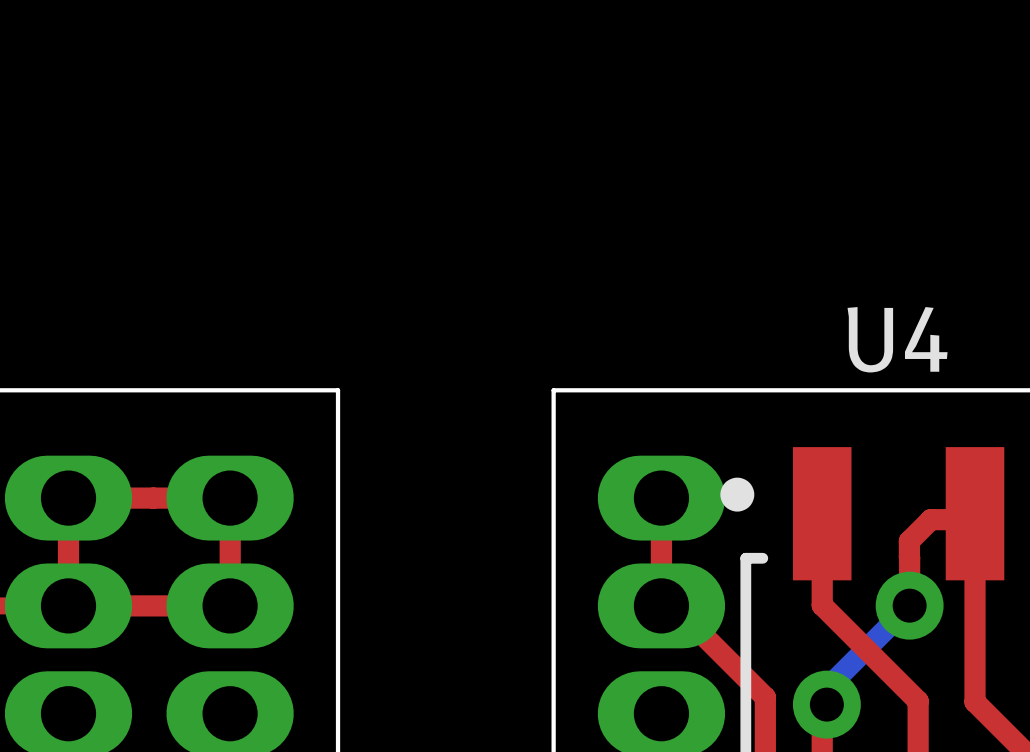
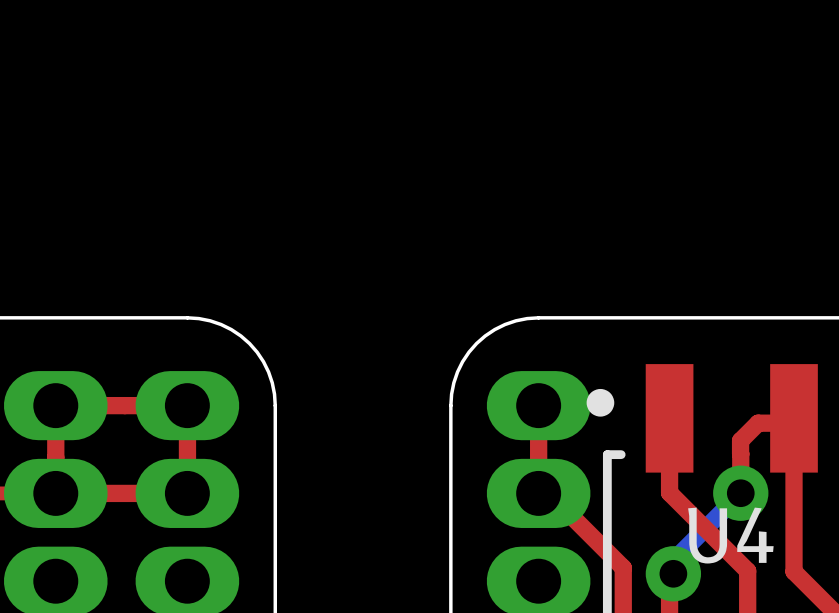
U4 name position: U4 (897, 339) -> U4 (730, 535)
board edge: (230, 390) (338, 390) (338, 498) -> (187, 317) (221, 324) (249, 343) (268, 372) (275, 405)
board edge: (661, 390) (553, 390) (553, 498) -> (538, 317) (505, 324) (476, 343) (457, 372) (450, 405)

